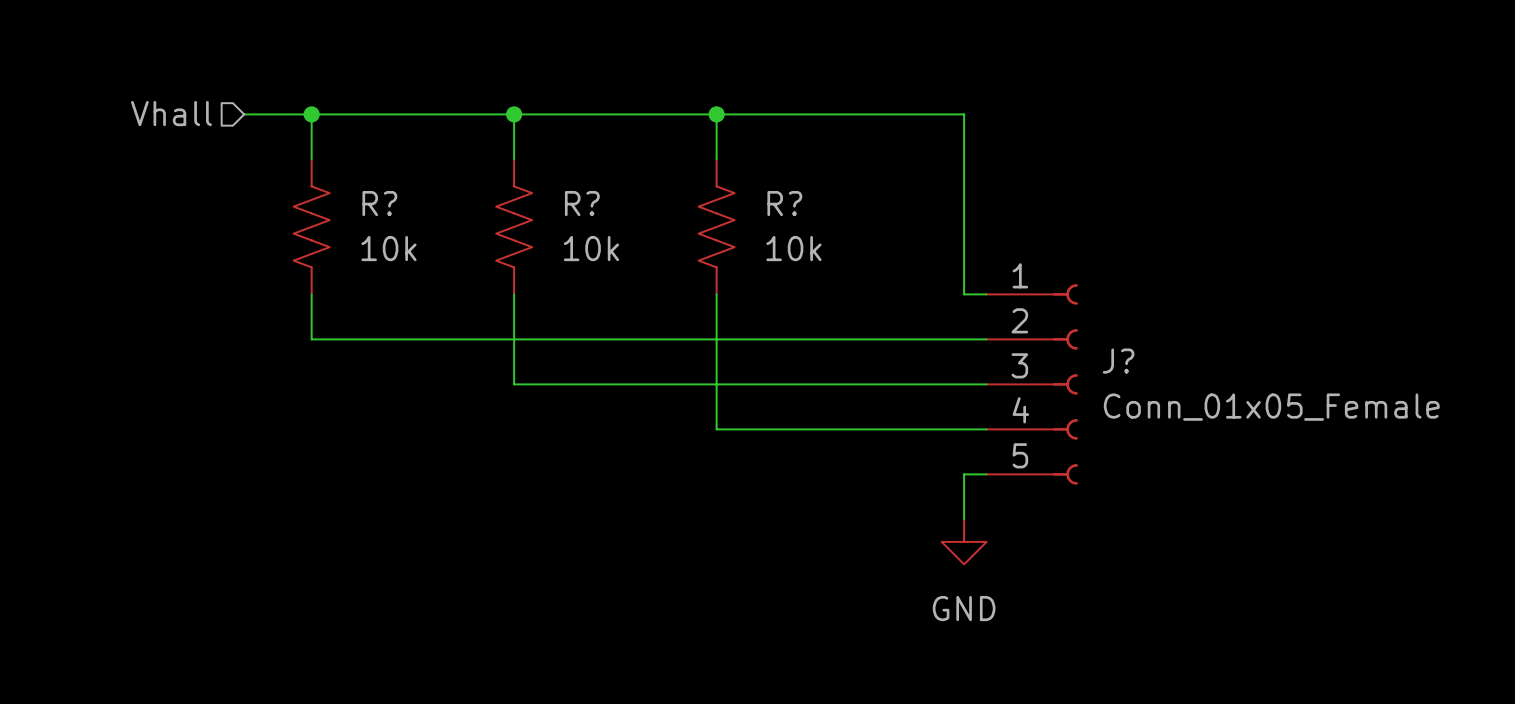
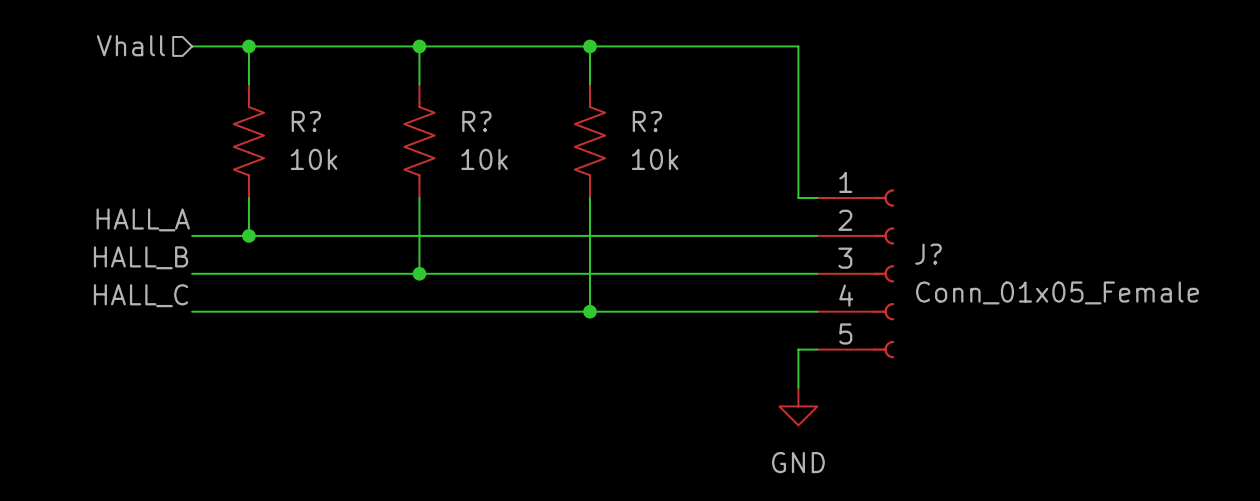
label: none -> HALL_A (143, 219)
wire: none -> (192, 235) (248, 235)
junction: none -> (248, 235)
label: none -> HALL_B (140, 257)
wire: none -> (192, 273) (419, 273)
junction: none -> (419, 273)
label: none -> HALL_C (140, 295)
wire: none -> (192, 311) (589, 311)
junction: none -> (589, 311)

